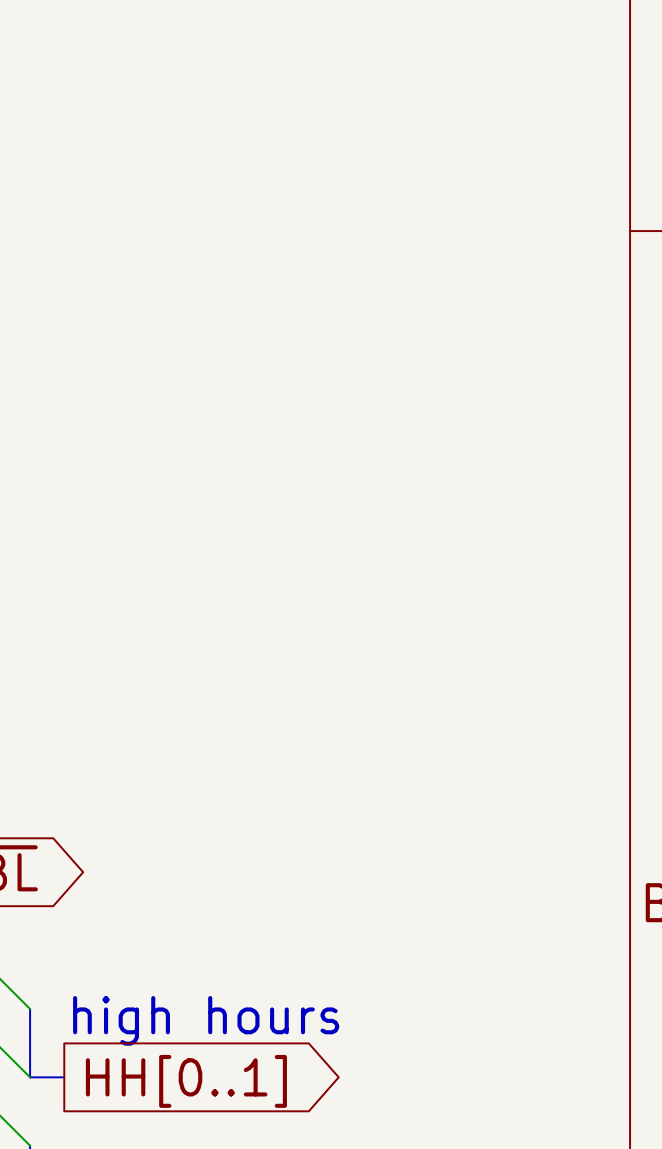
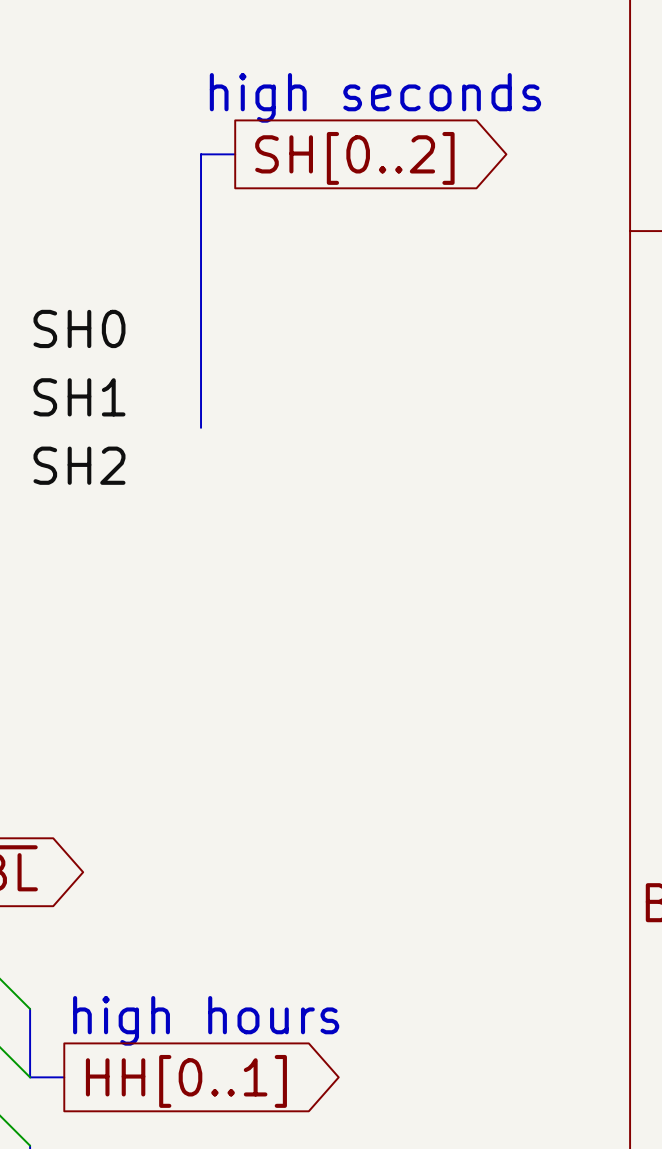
text: none -> high seconds (375, 97)
bus: none -> (235, 154) (201, 154) (201, 427)
global label: none -> SH[0..2] (354, 158)
label: none -> SH0 (79, 328)
label: none -> SH1 (79, 397)
label: none -> SH2 (79, 465)

